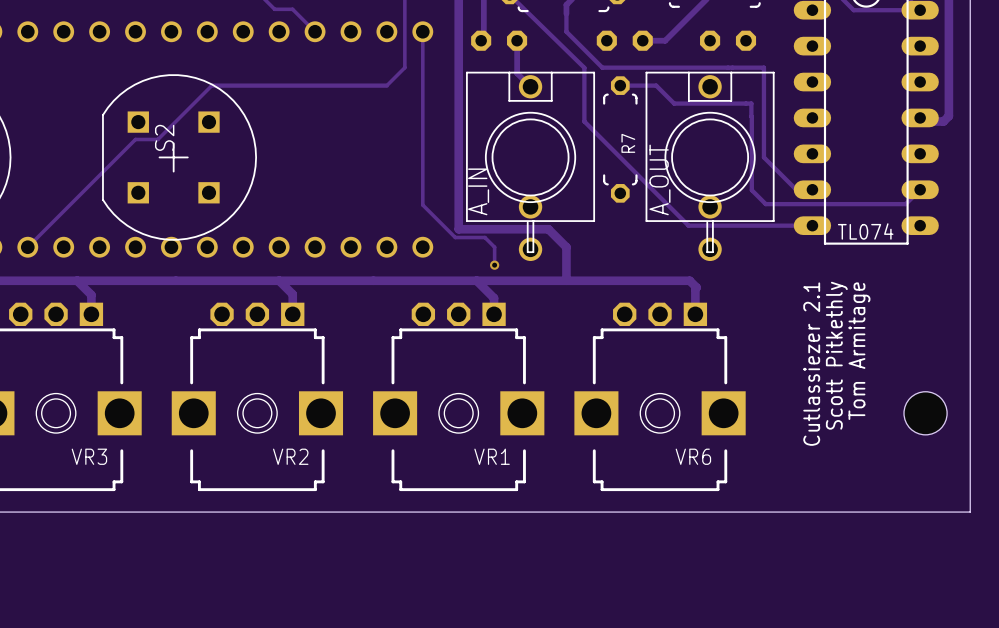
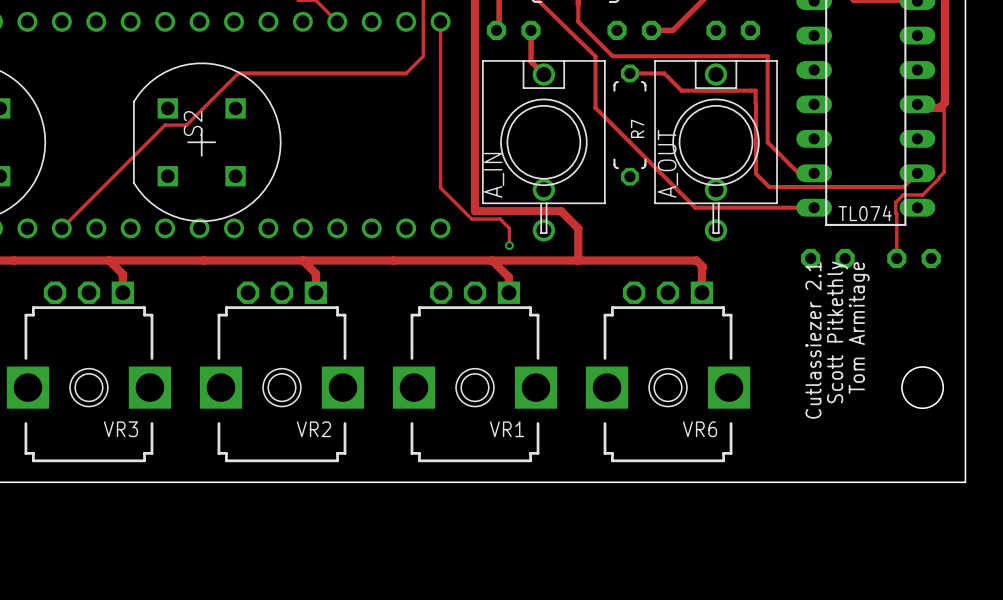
track: none -> (944, 99) (944, 172) (922, 194) (903, 194) (895, 202) (896, 258)
part: none -> (827, 258)
part: none -> (913, 258)

